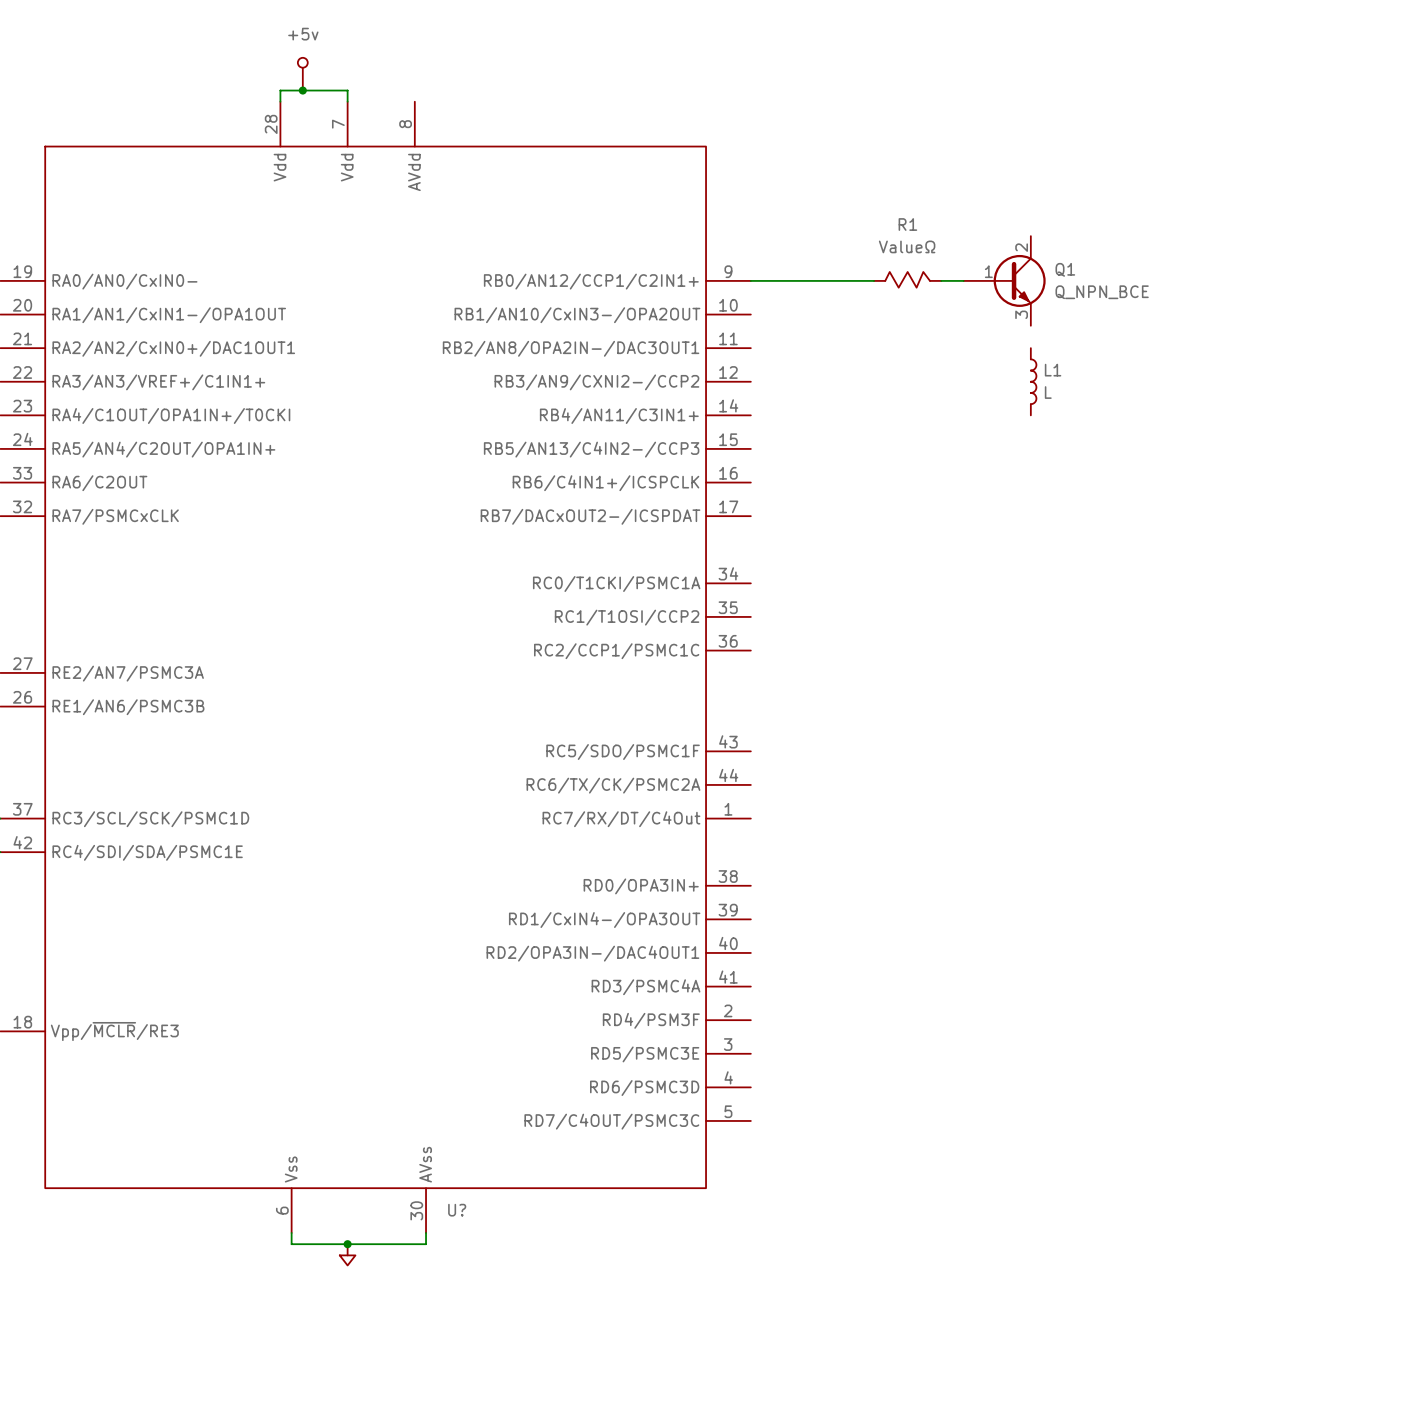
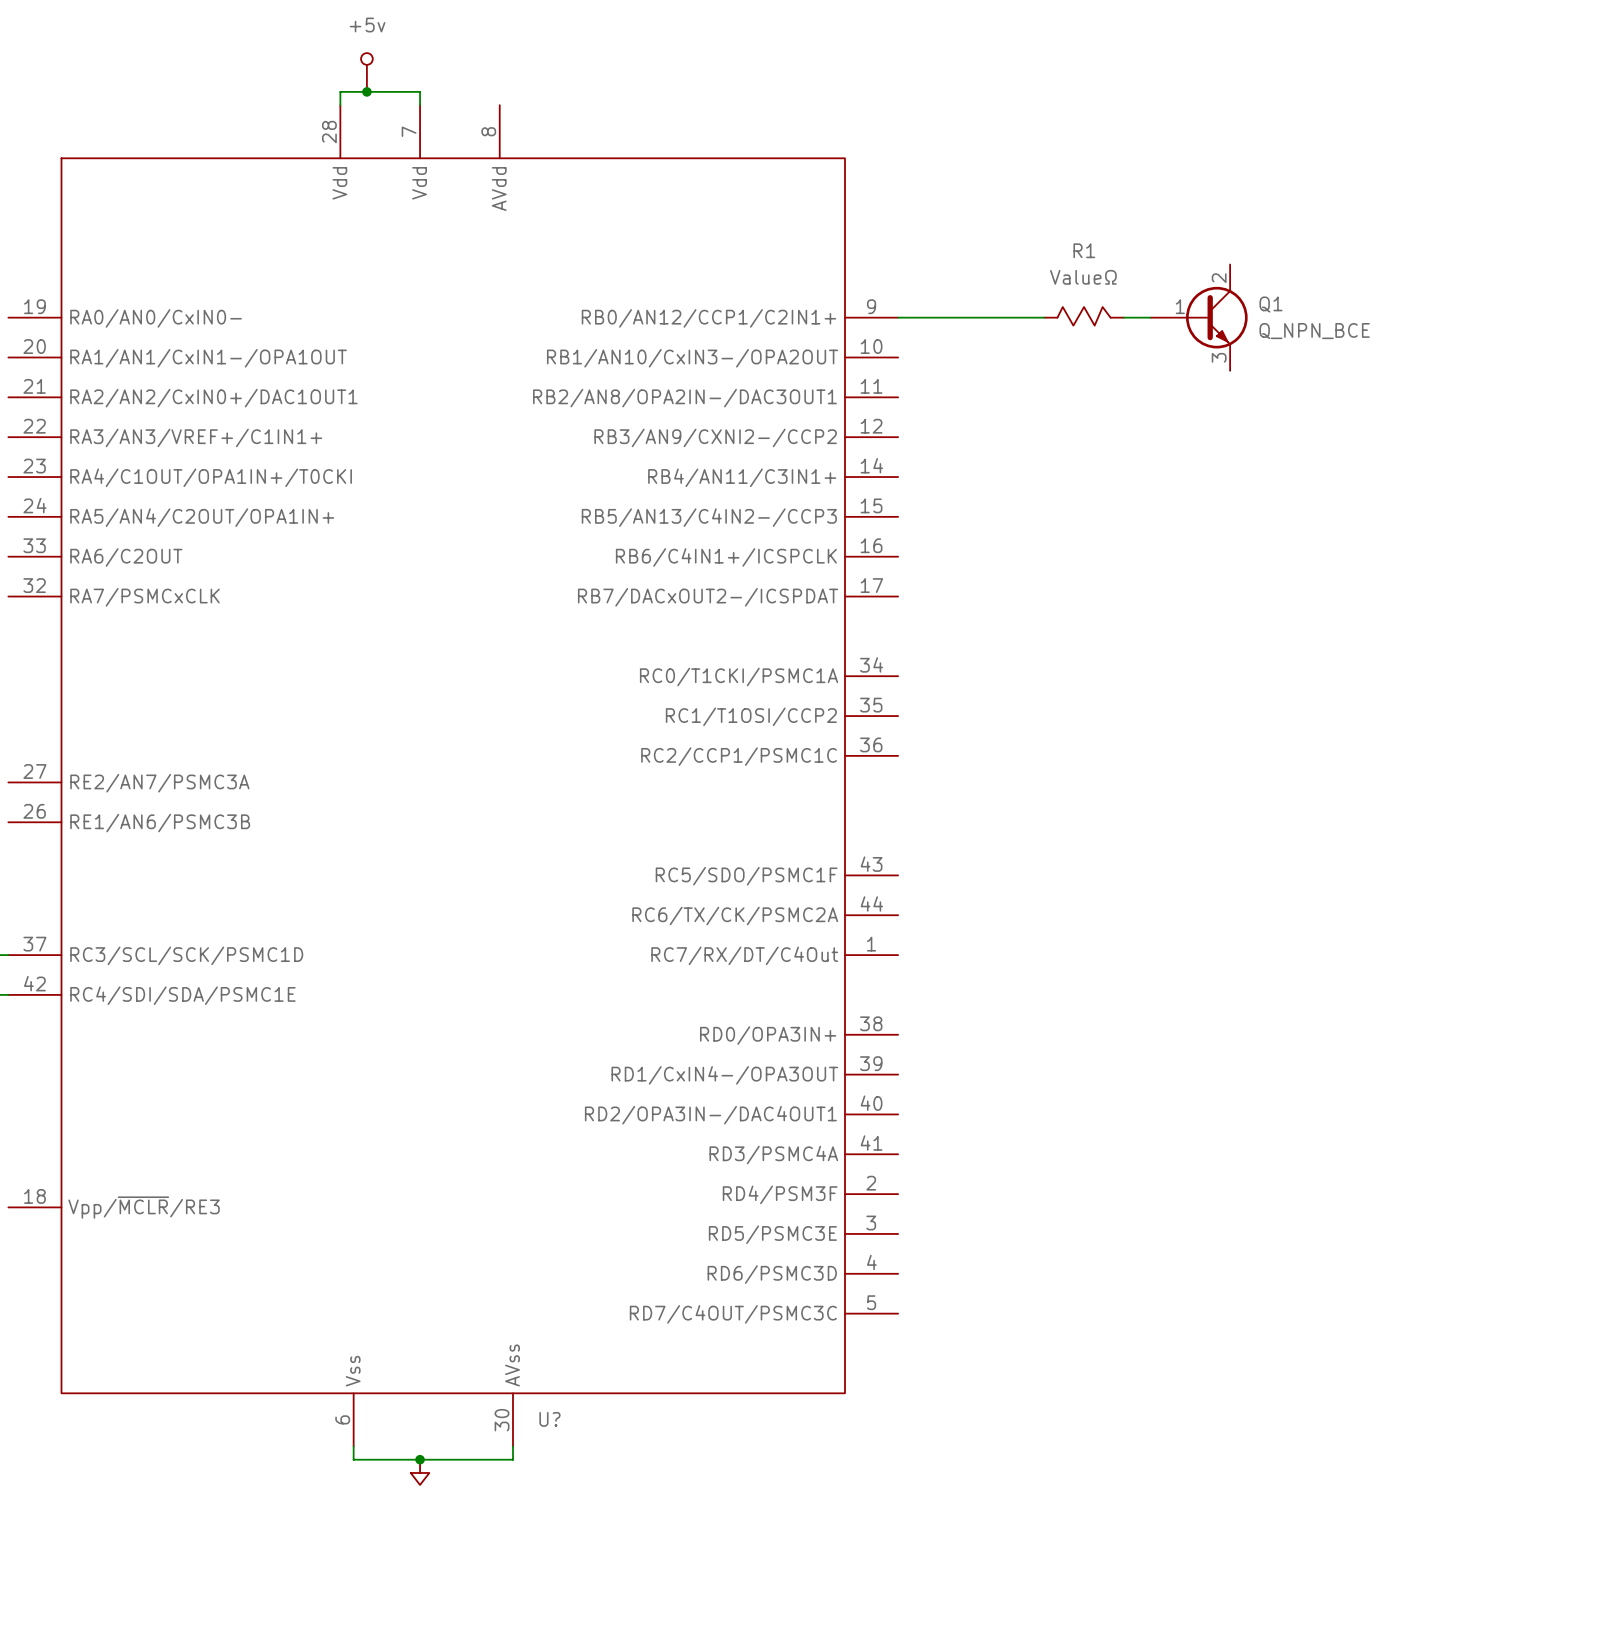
L1: L (1033, 381) -> none

